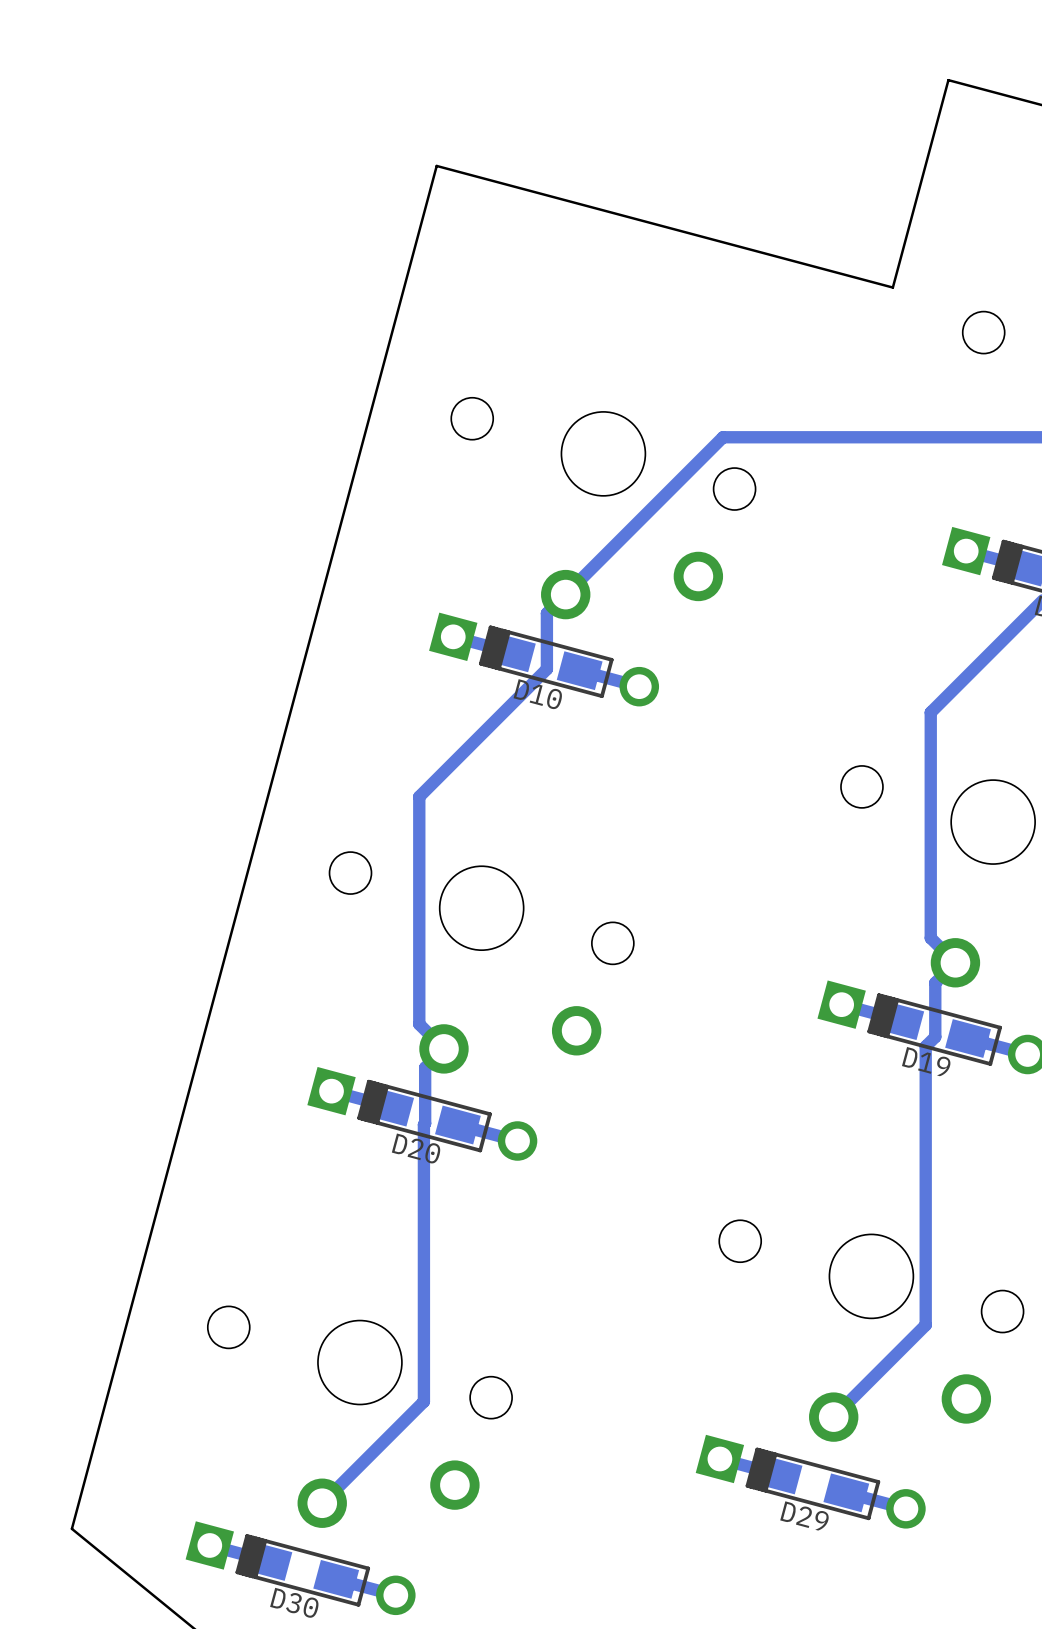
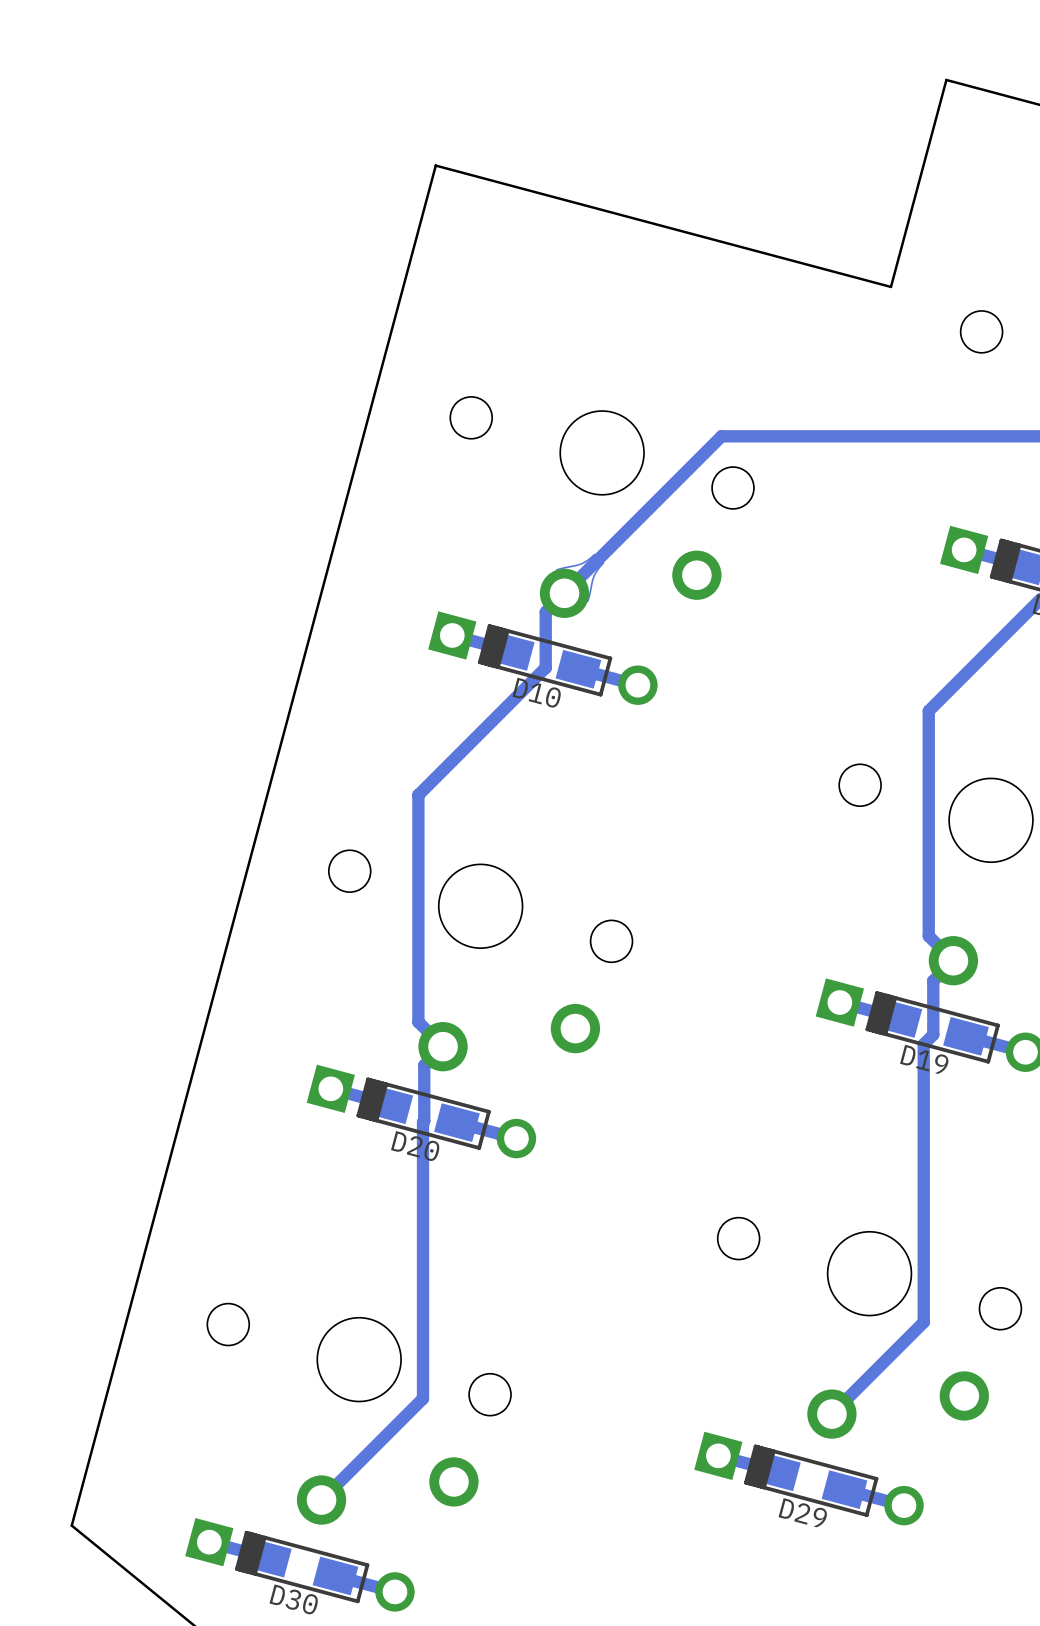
zone outline: none -> (594, 554) (579, 564) (556, 570) (555, 602) (587, 601) (593, 577) (603, 563) (594, 554)

